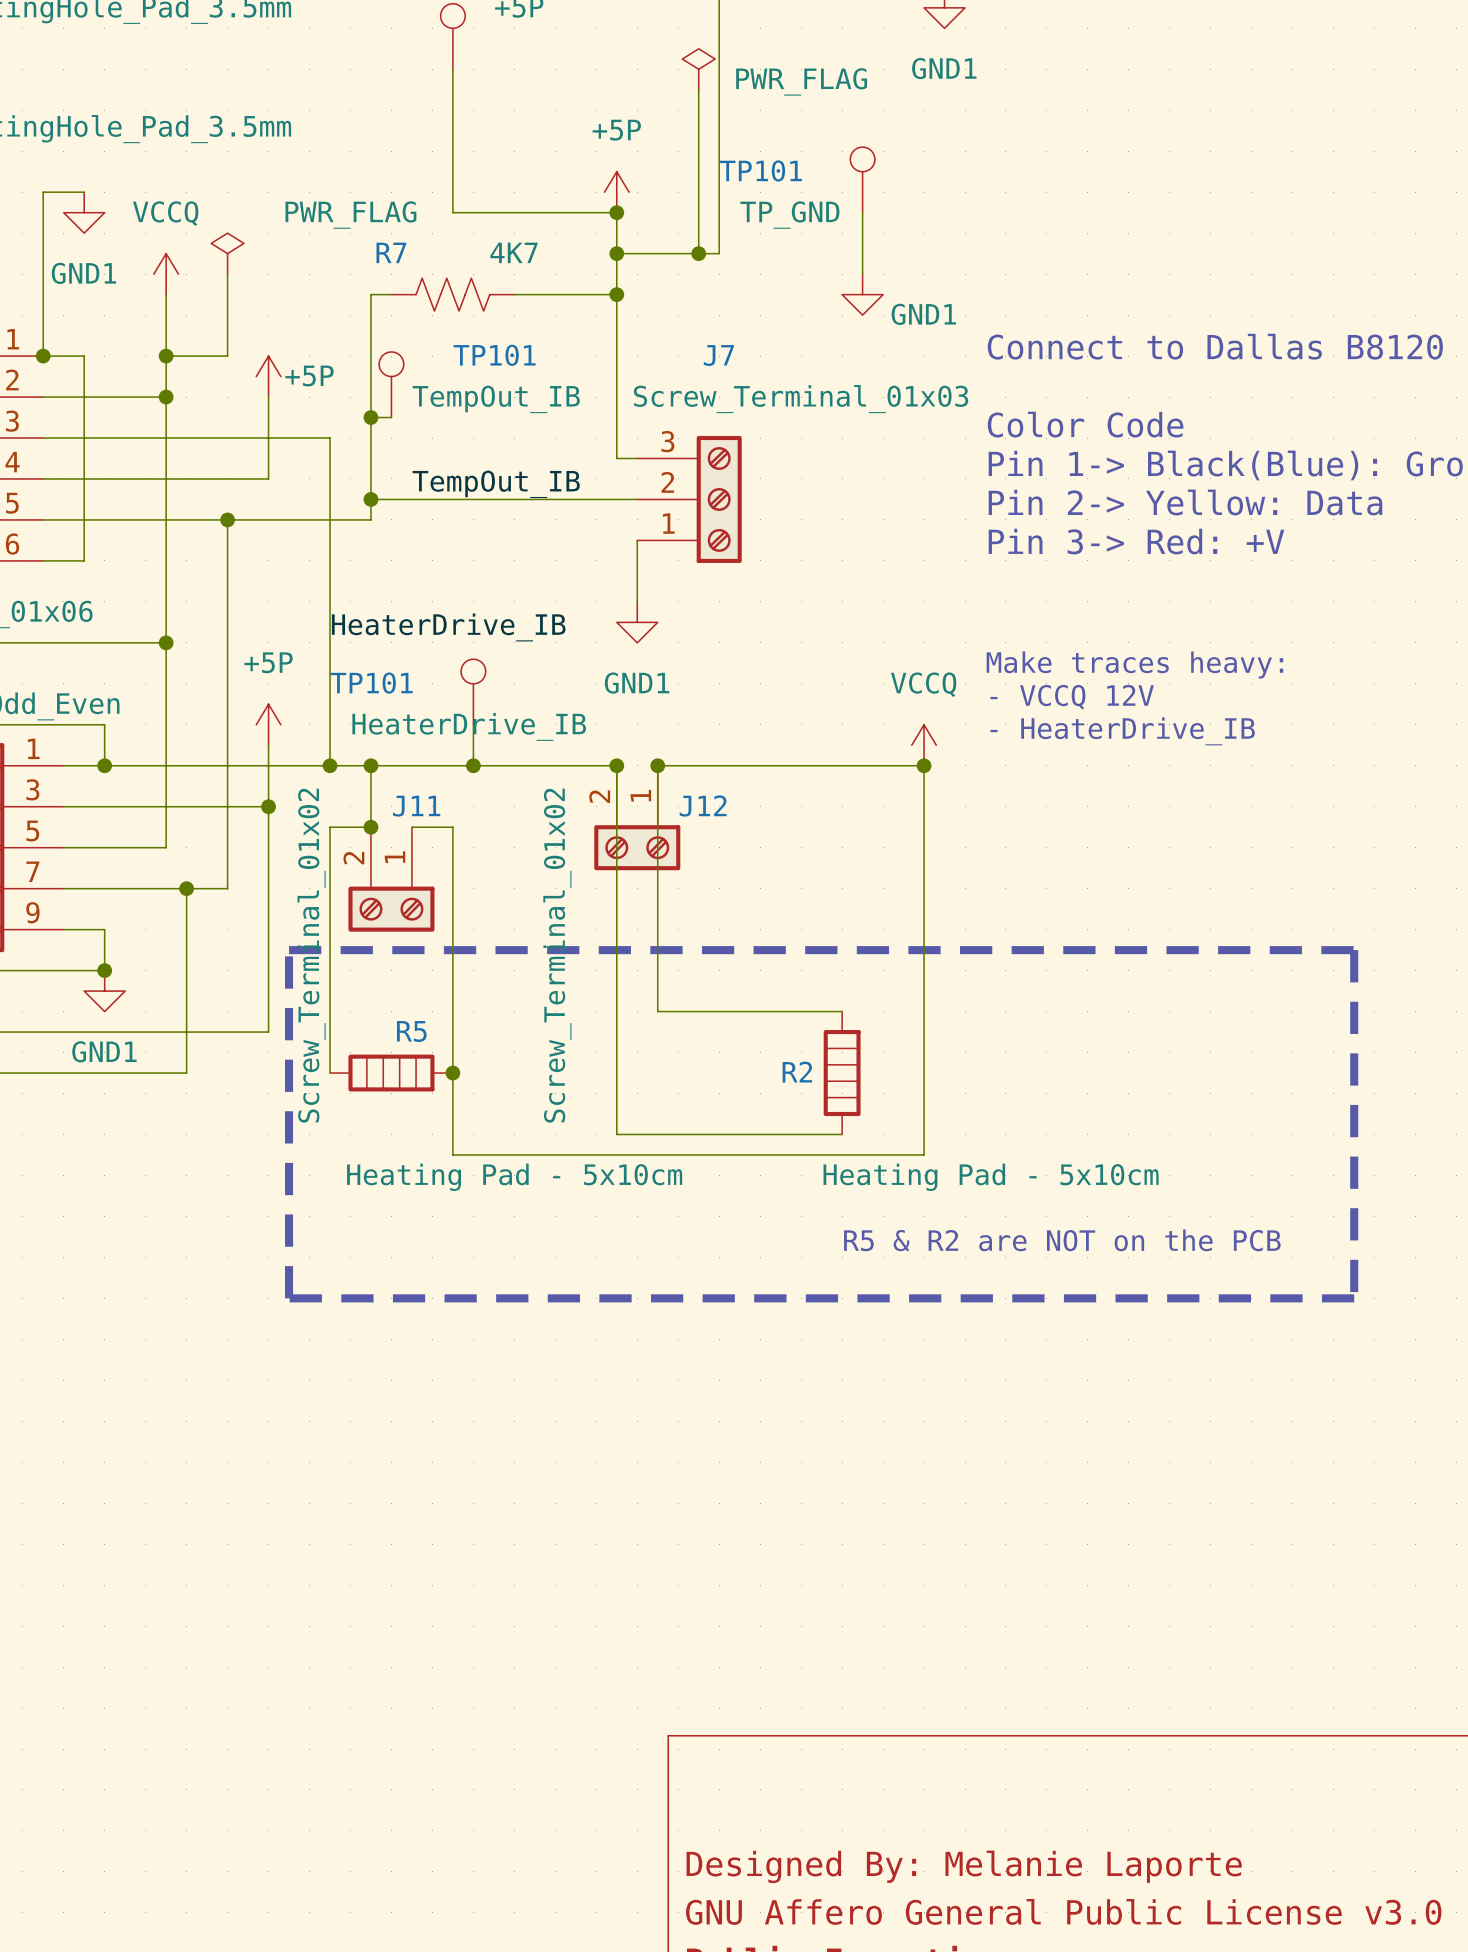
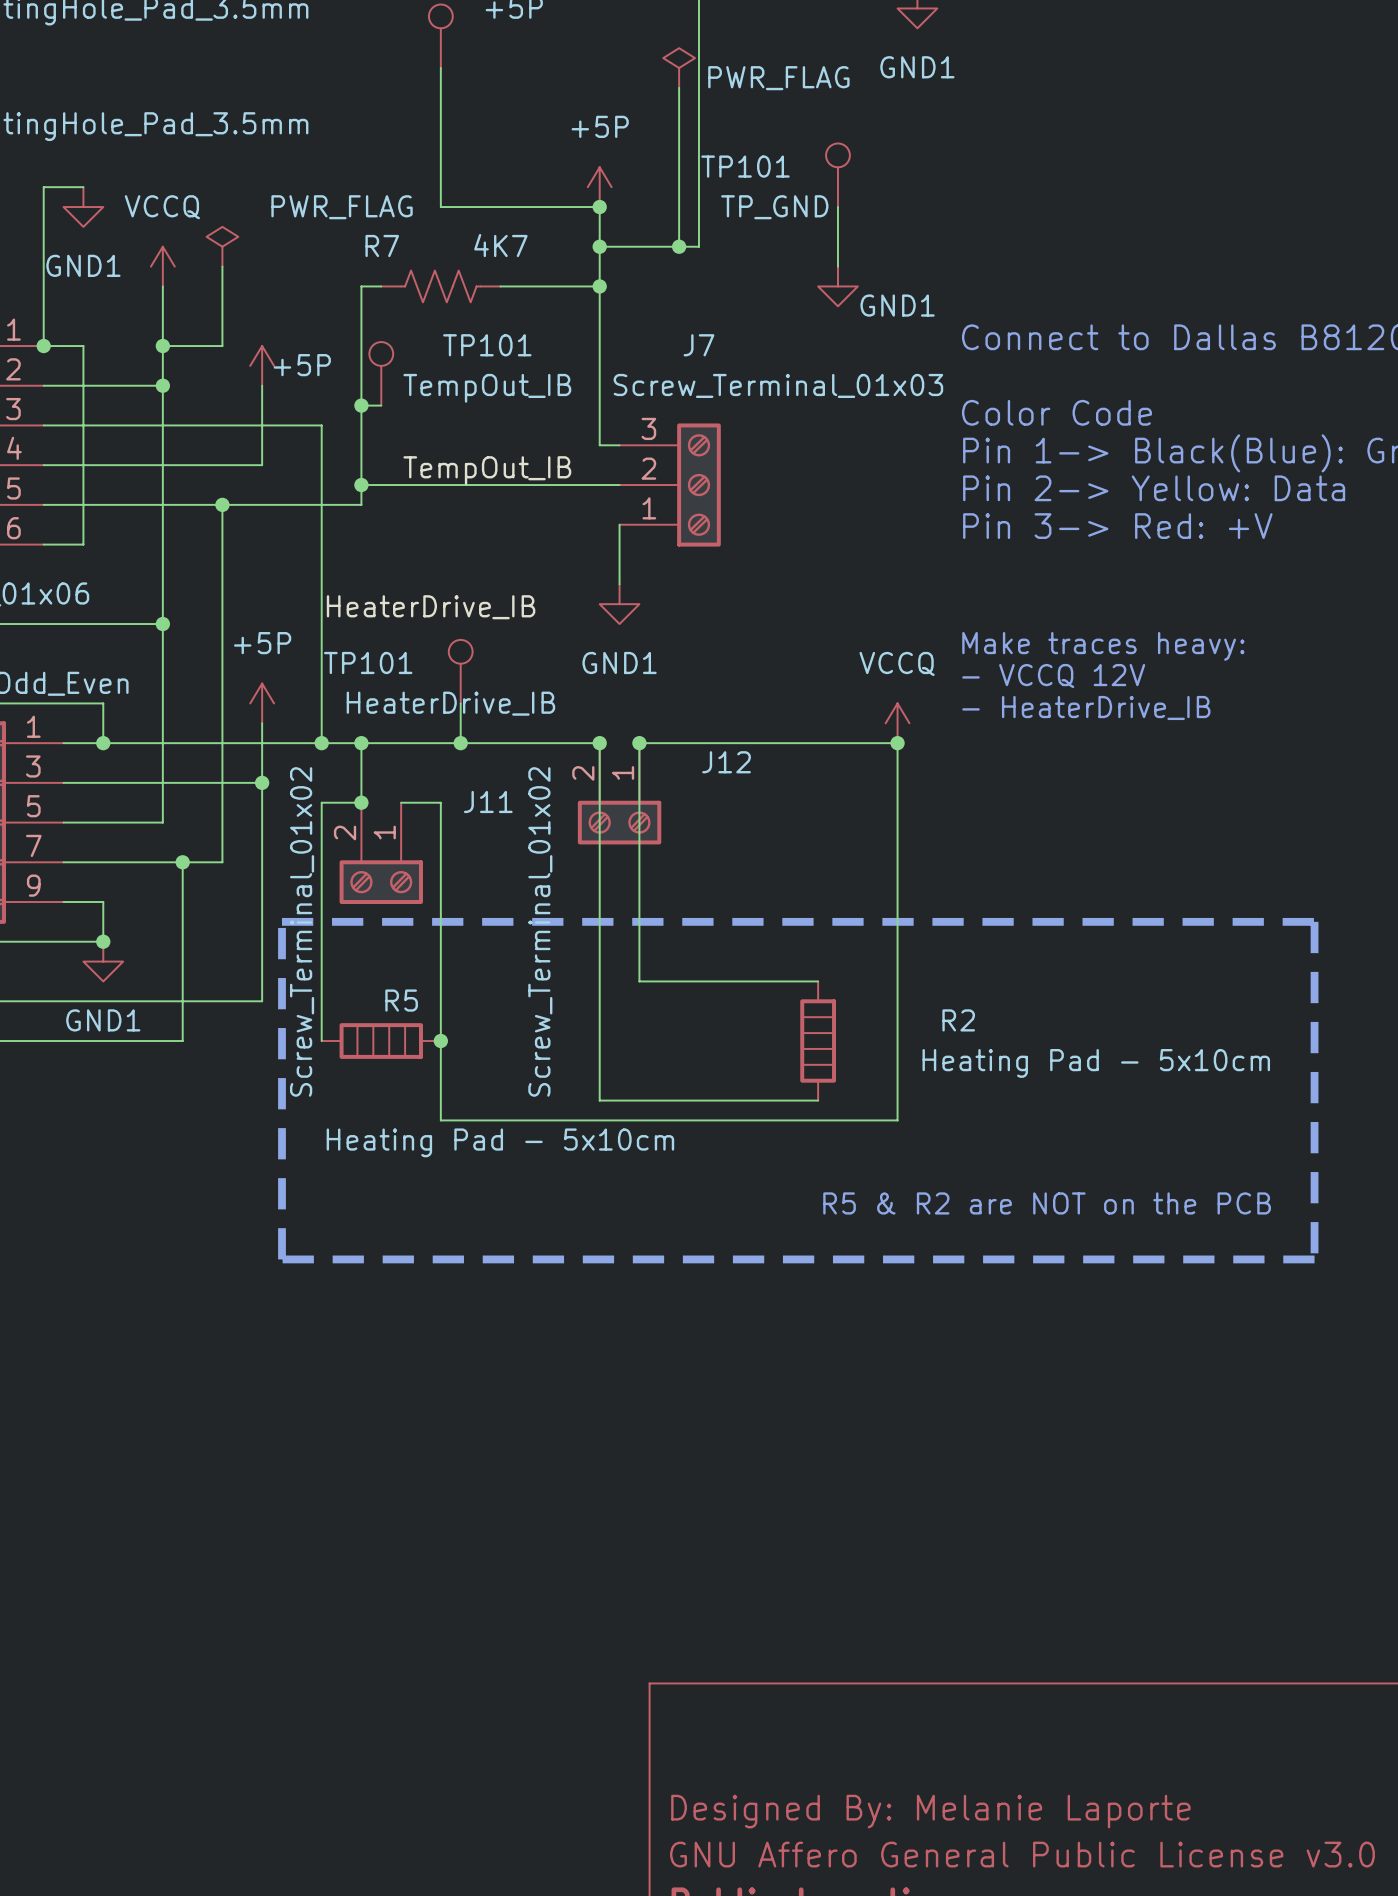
J12 name position: J12 (703, 805) -> J12 (726, 762)
J11 name position: J11 (416, 806) -> J11 (488, 801)
R2 name position: R2 (797, 1072) -> R2 (958, 1020)
R2 value position: Heating Pad - 5x10cm (991, 1177) -> Heating Pad - 5x10cm (1096, 1063)

